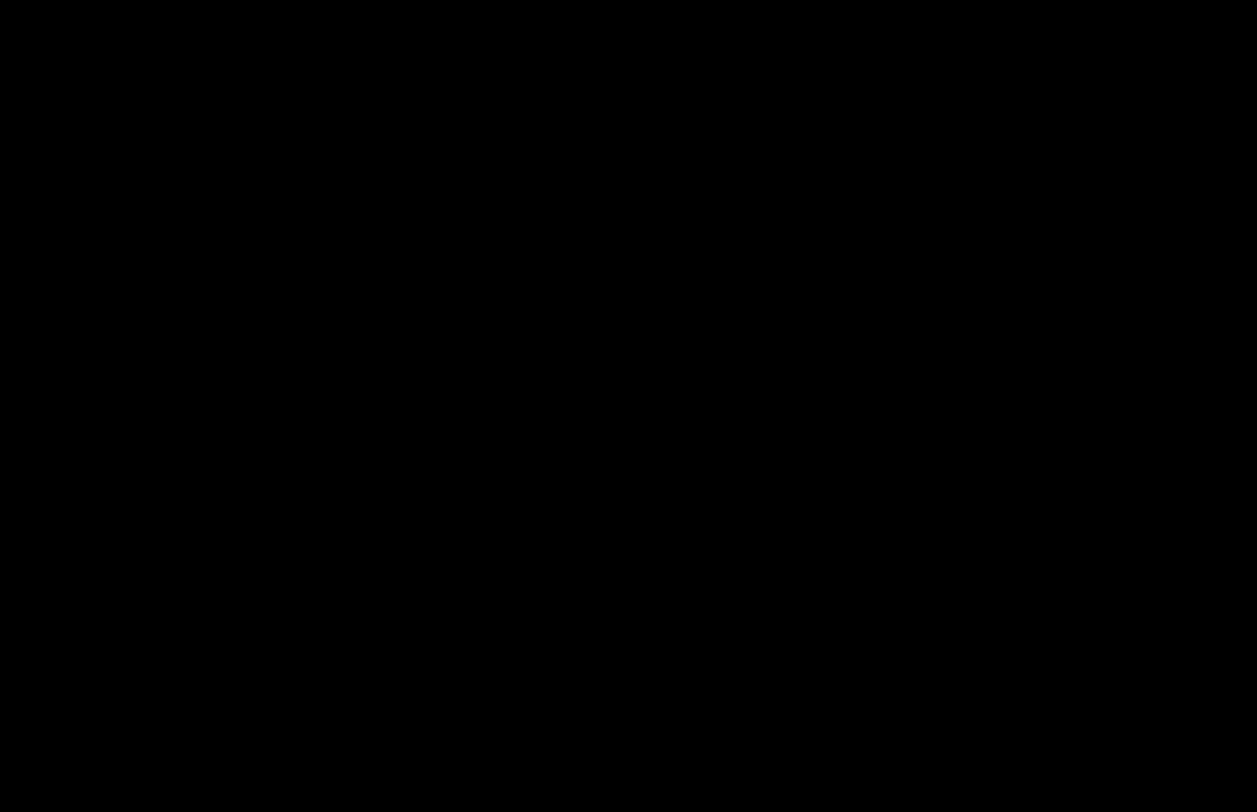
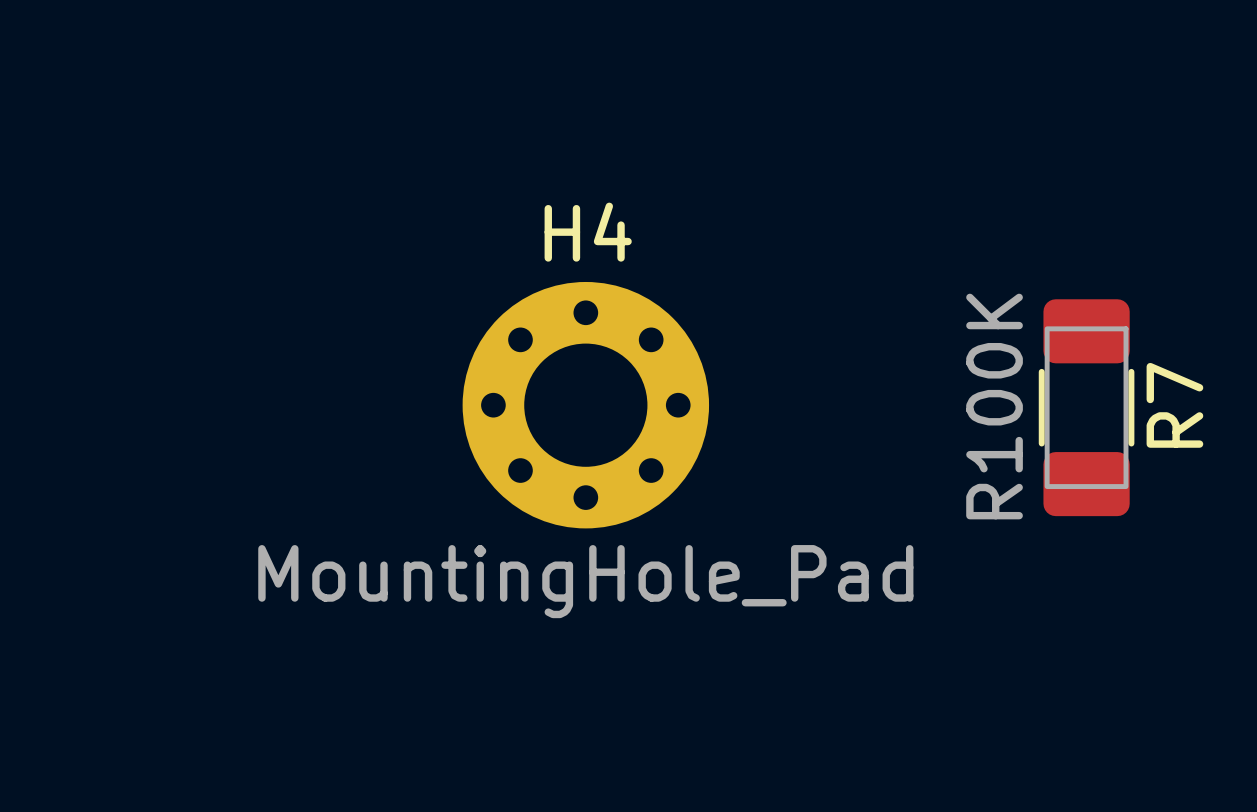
H4: none -> MountingHole_Pad (585, 405)
R7: none -> R100K (1086, 407)

